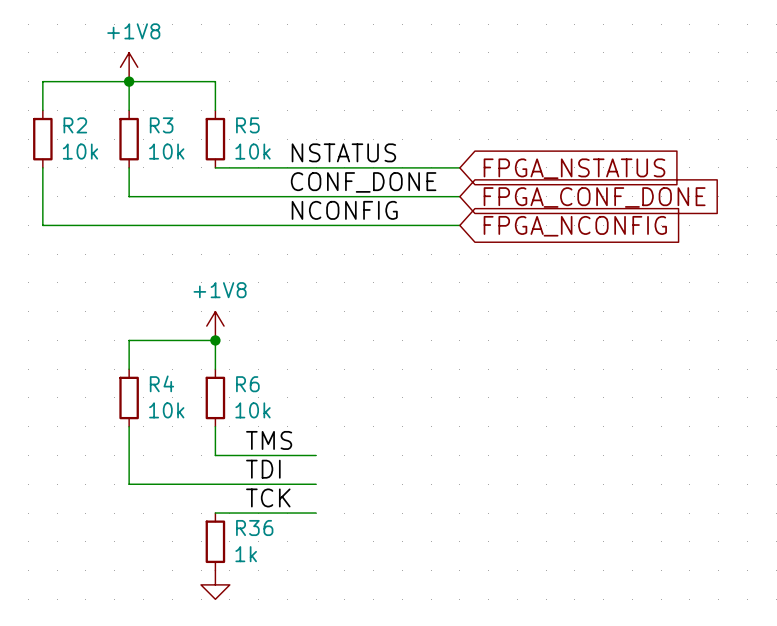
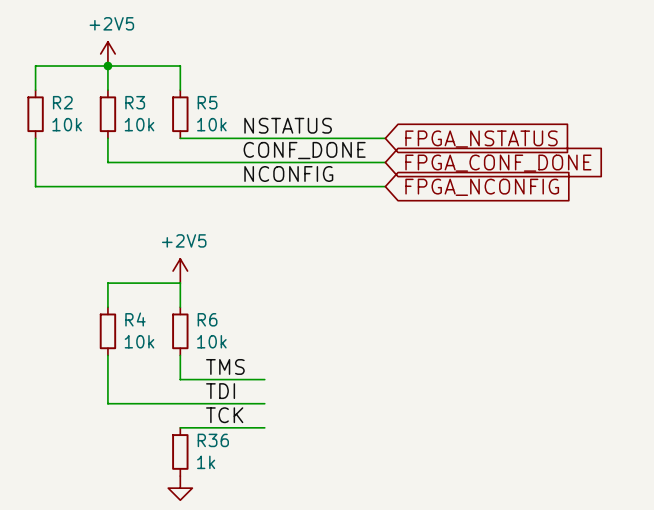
power symbol: +1V8 (129, 67) -> +2V5 (107, 53)
power symbol: +1V8 (215, 326) -> +2V5 (180, 271)
junction: (215, 340) -> none

